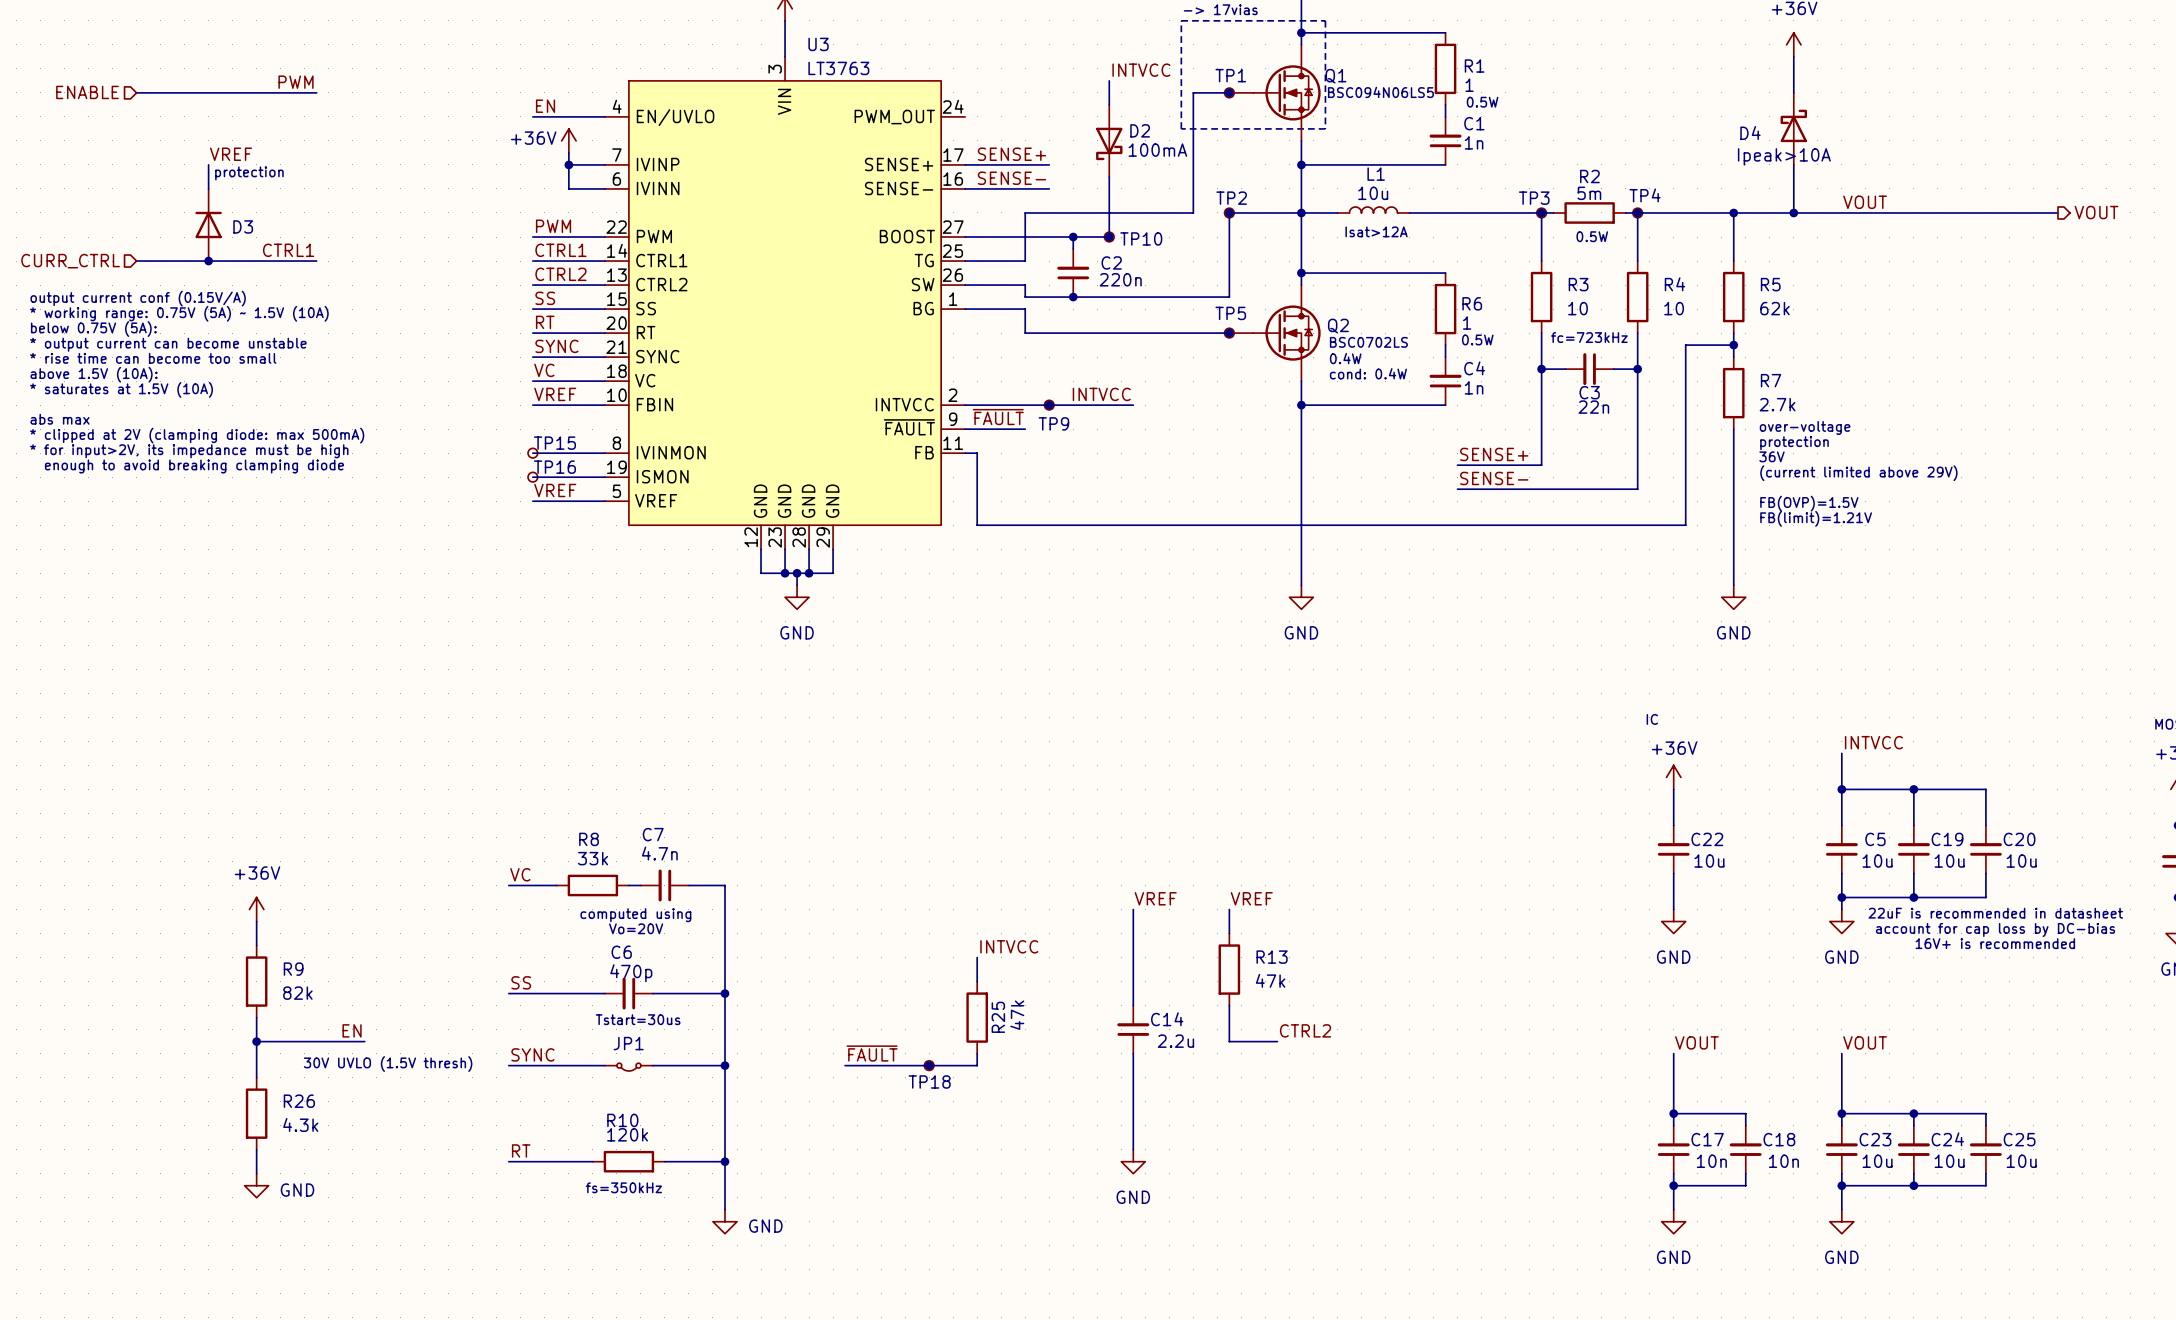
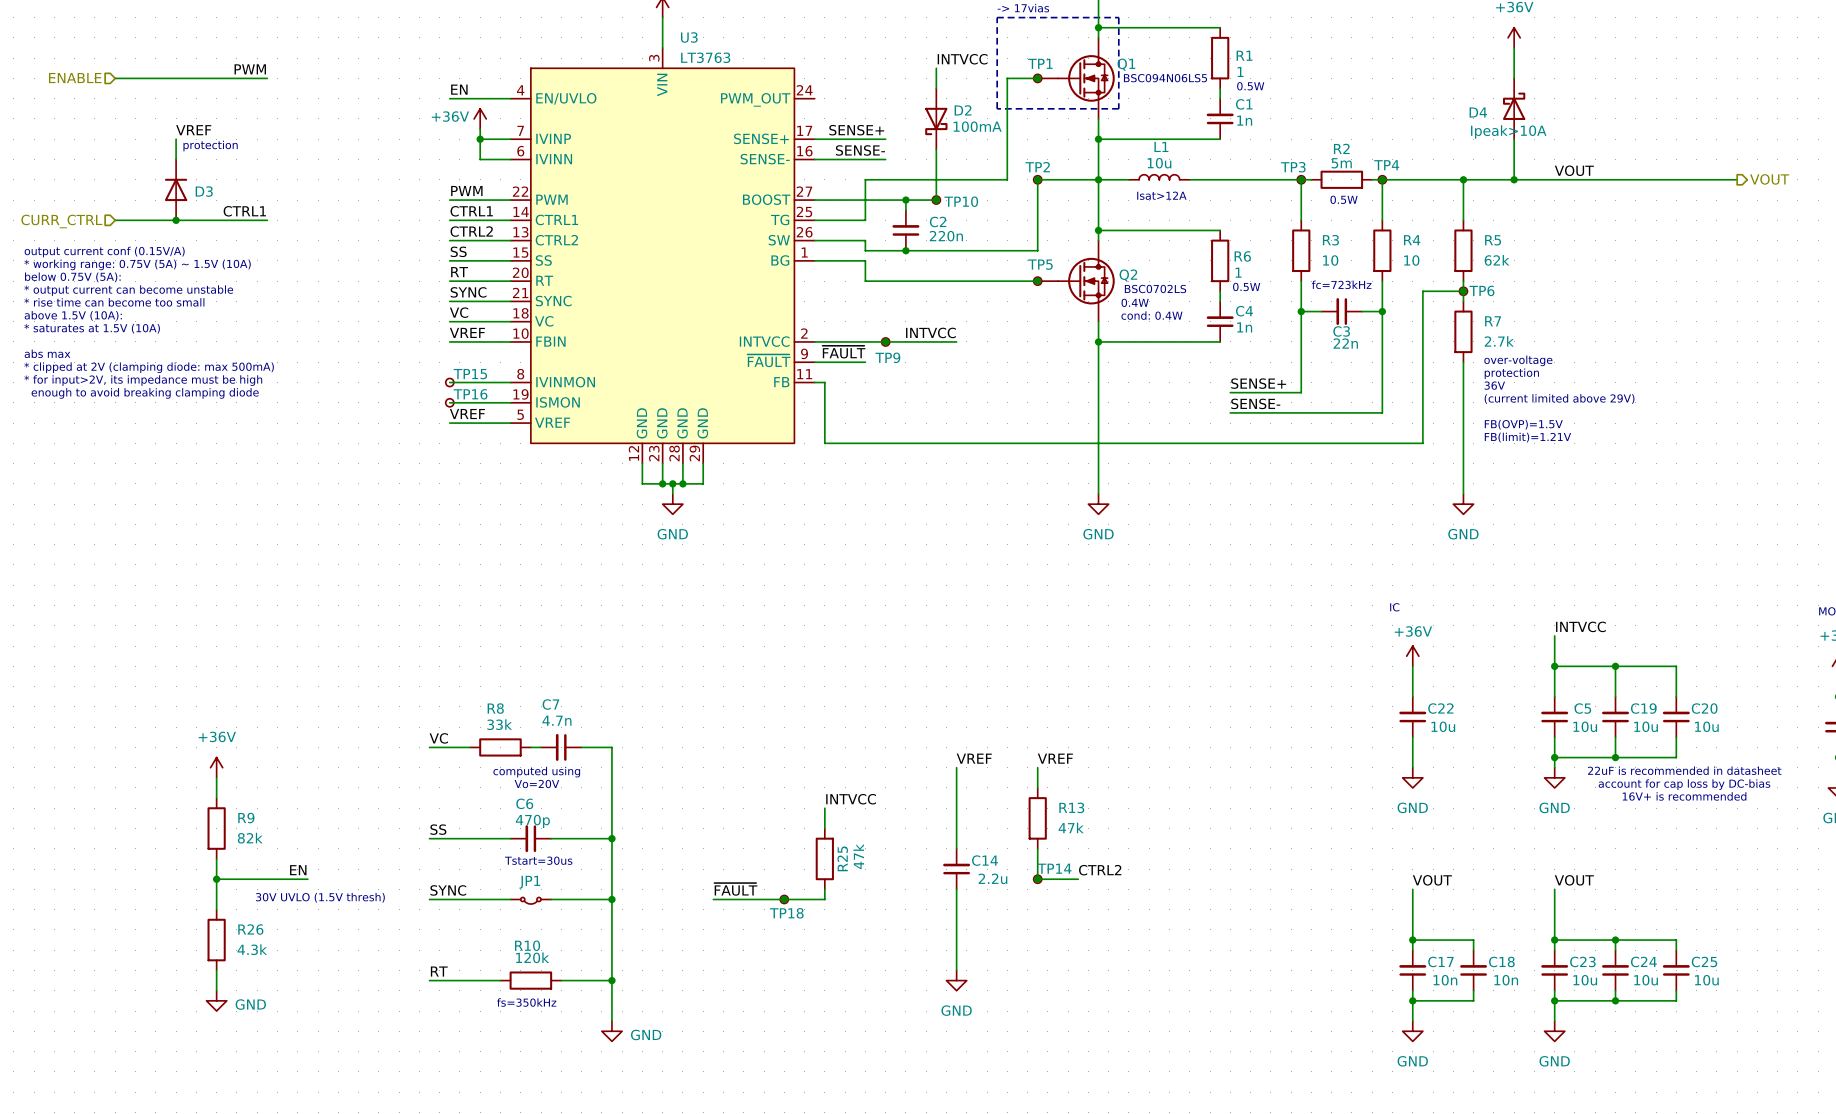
TP6: none -> (1463, 291)
junction: none -> (1037, 879)
TP14: none -> (1037, 879)

